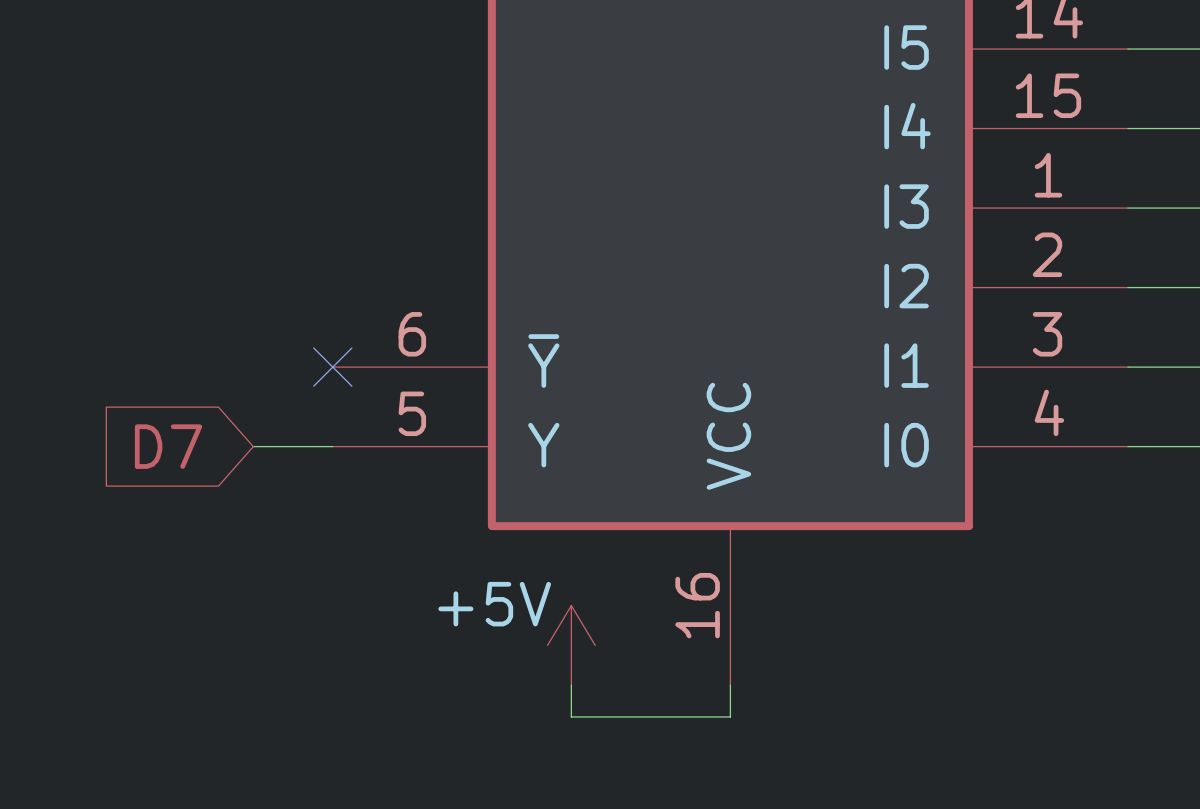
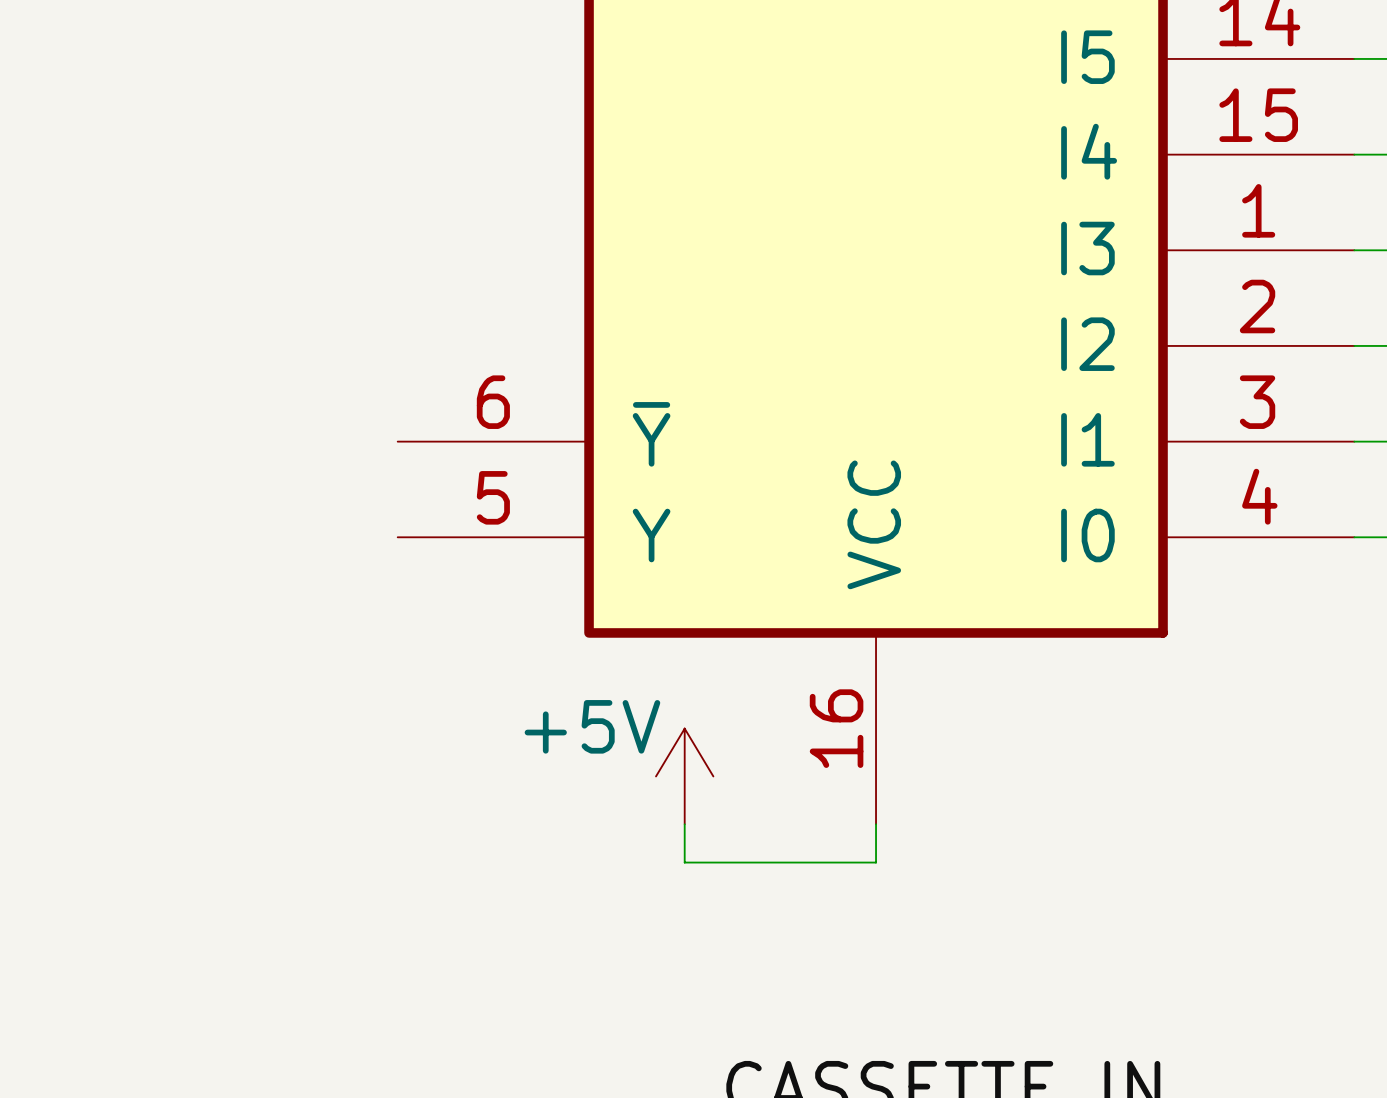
no-connect mark: (332, 367) -> none
global label: D7 (168, 446) -> none
wire: (253, 446) (332, 446) -> none

